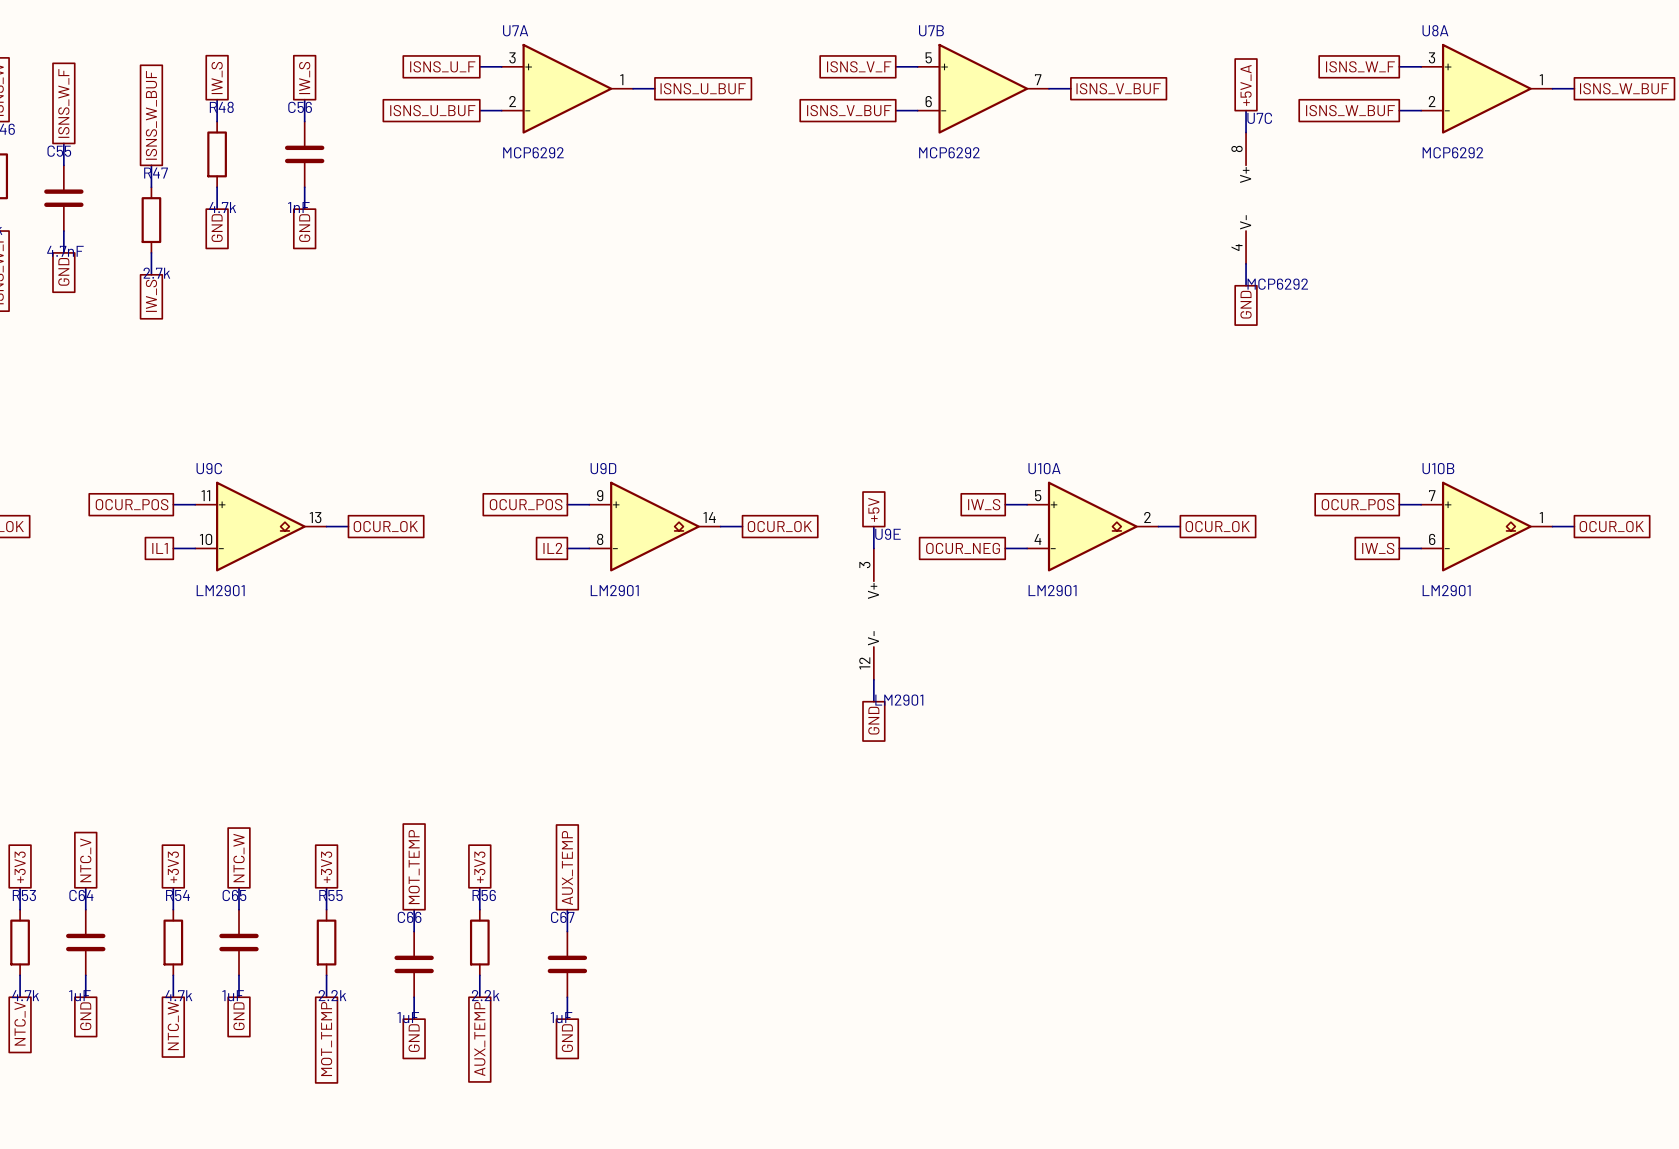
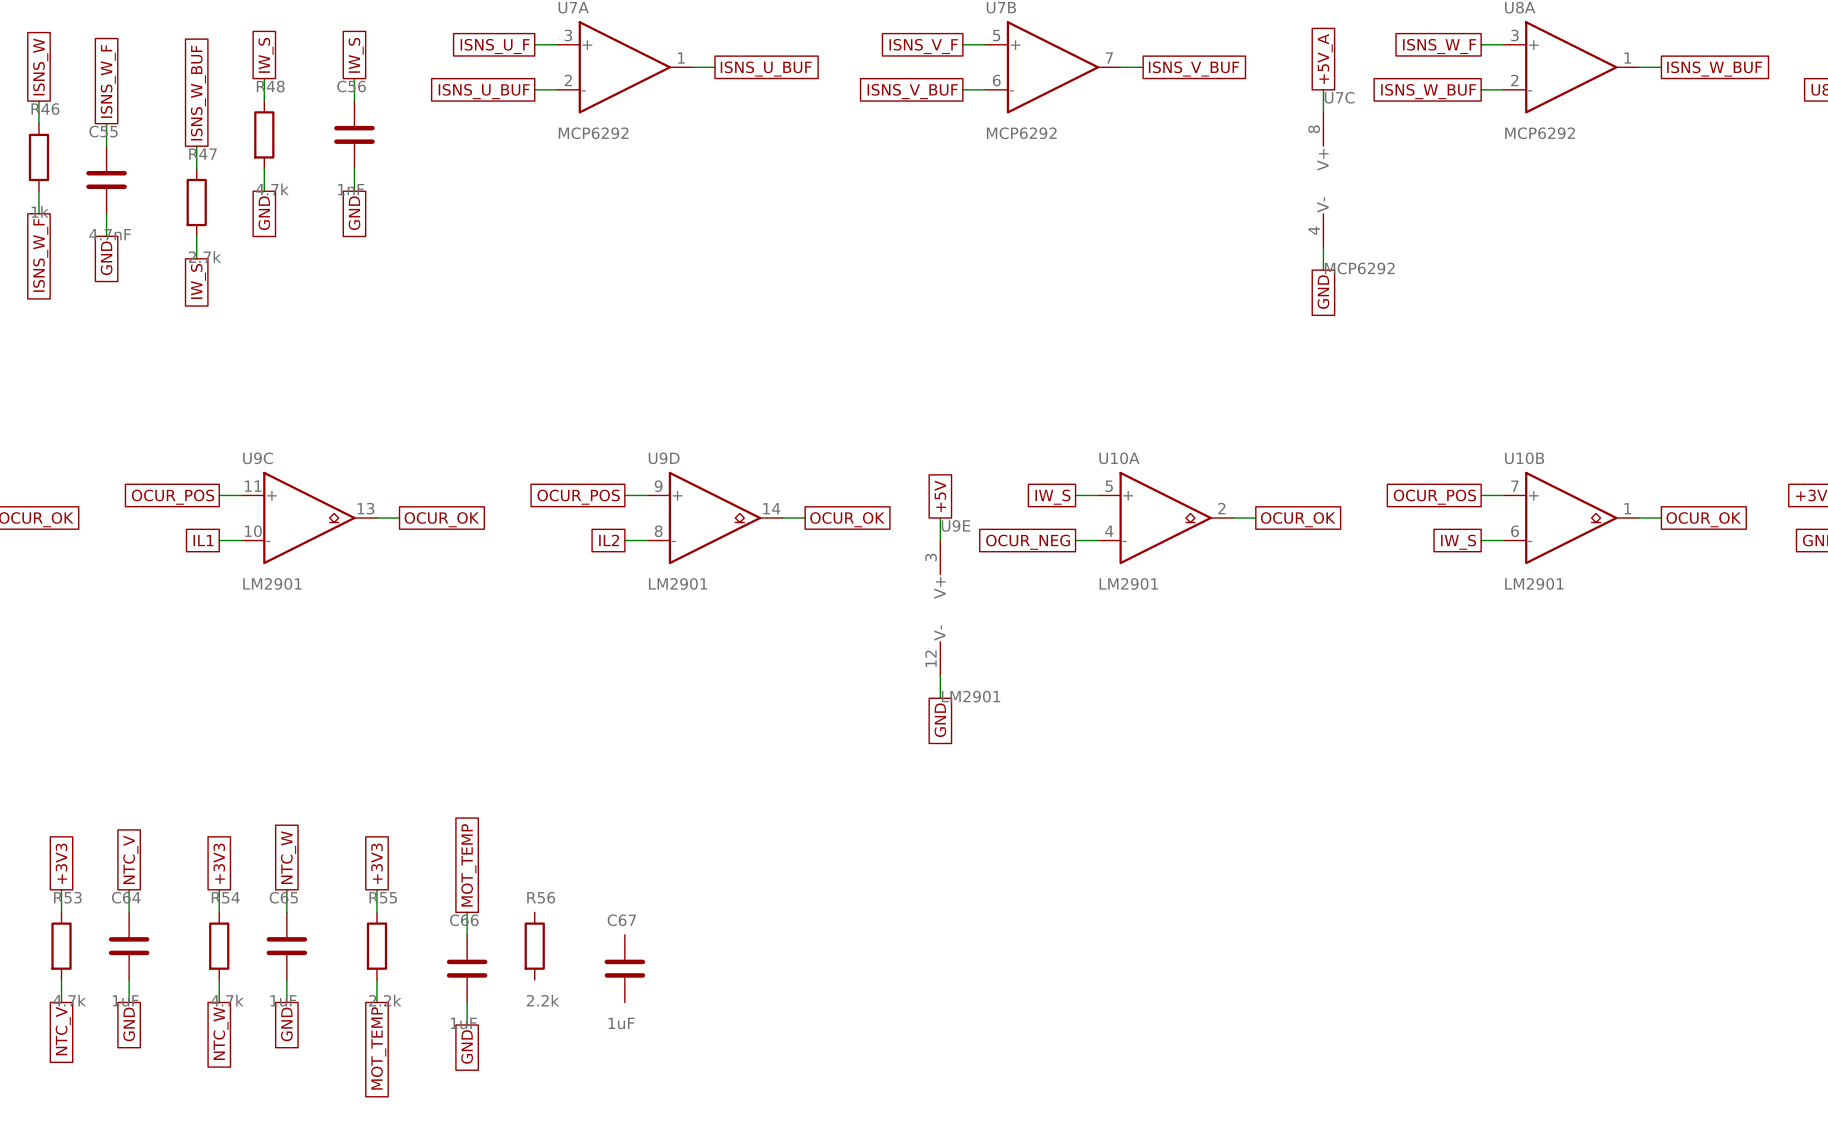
global label: +3V3 (479, 867) -> none
global label: AUX_TEMP (567, 868) -> none
wire: (479, 887) (479, 909) -> none
wire: (567, 909) (567, 931) -> none
wire: (479, 975) (479, 997) -> none
wire: (567, 997) (567, 1019) -> none
global label: AUX_TEMP (479, 1038) -> none
global label: GND (567, 1038) -> none

